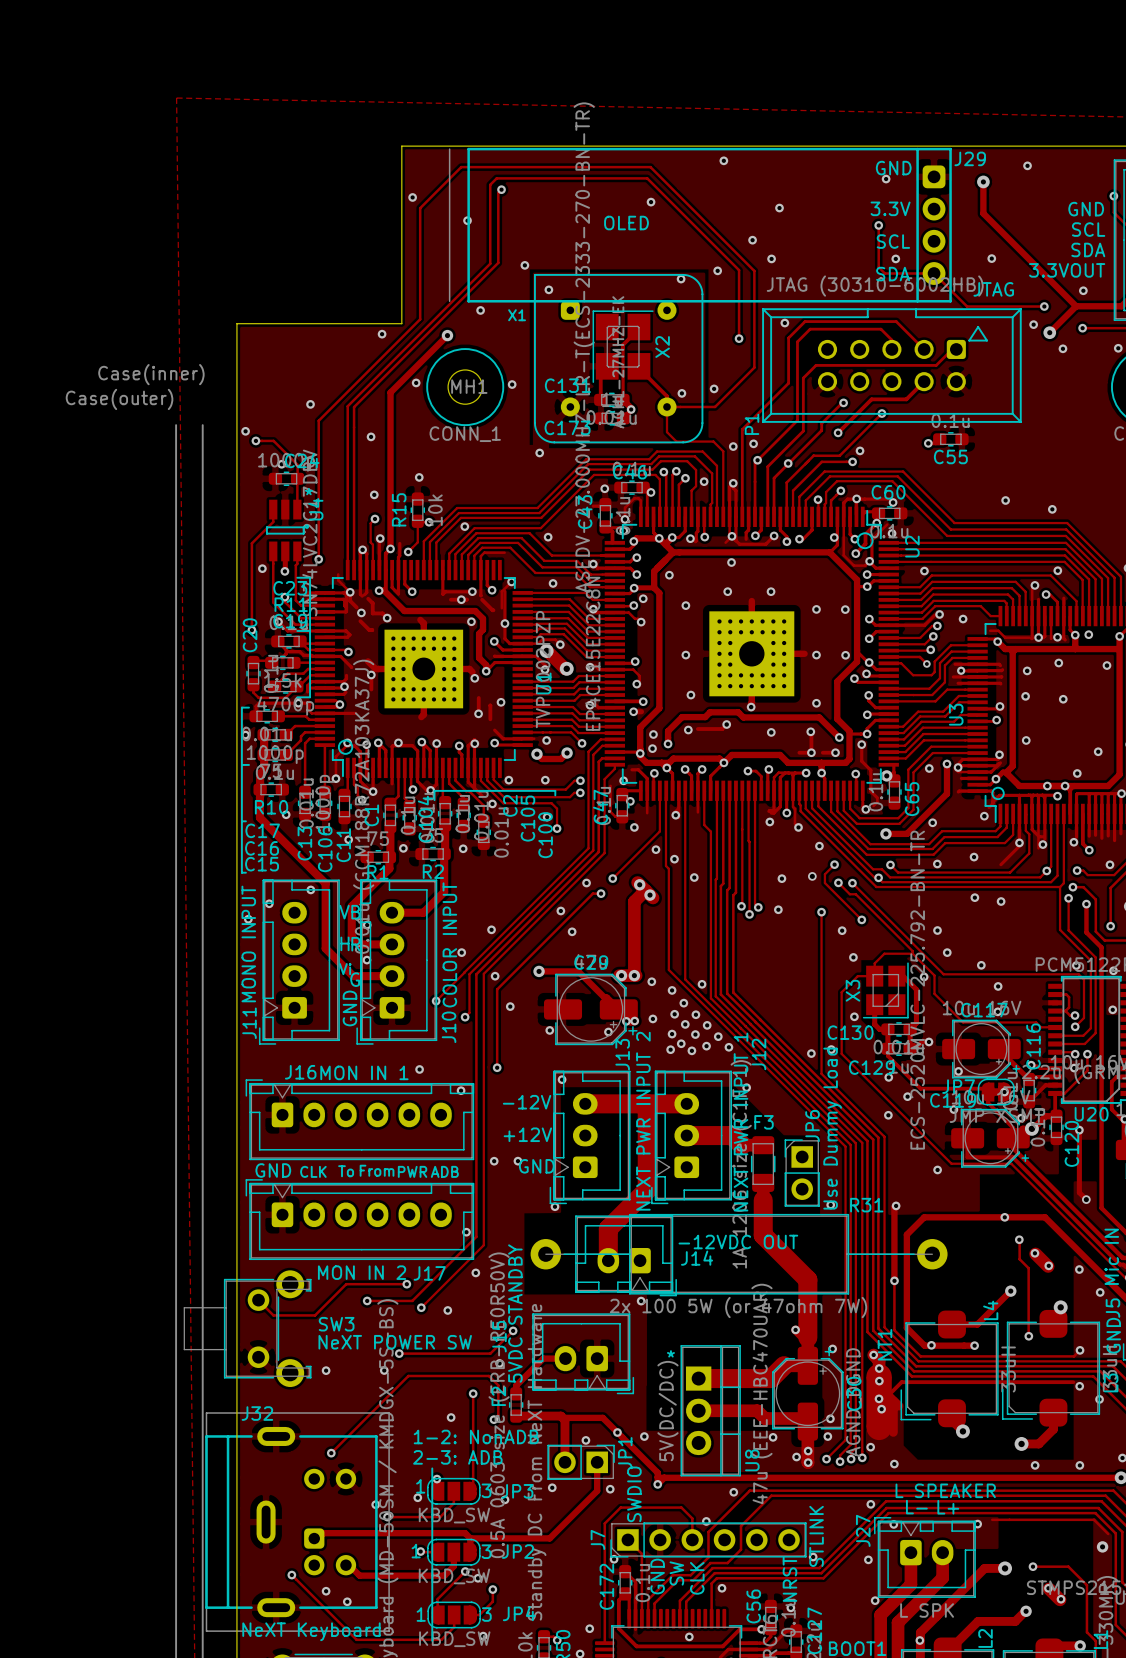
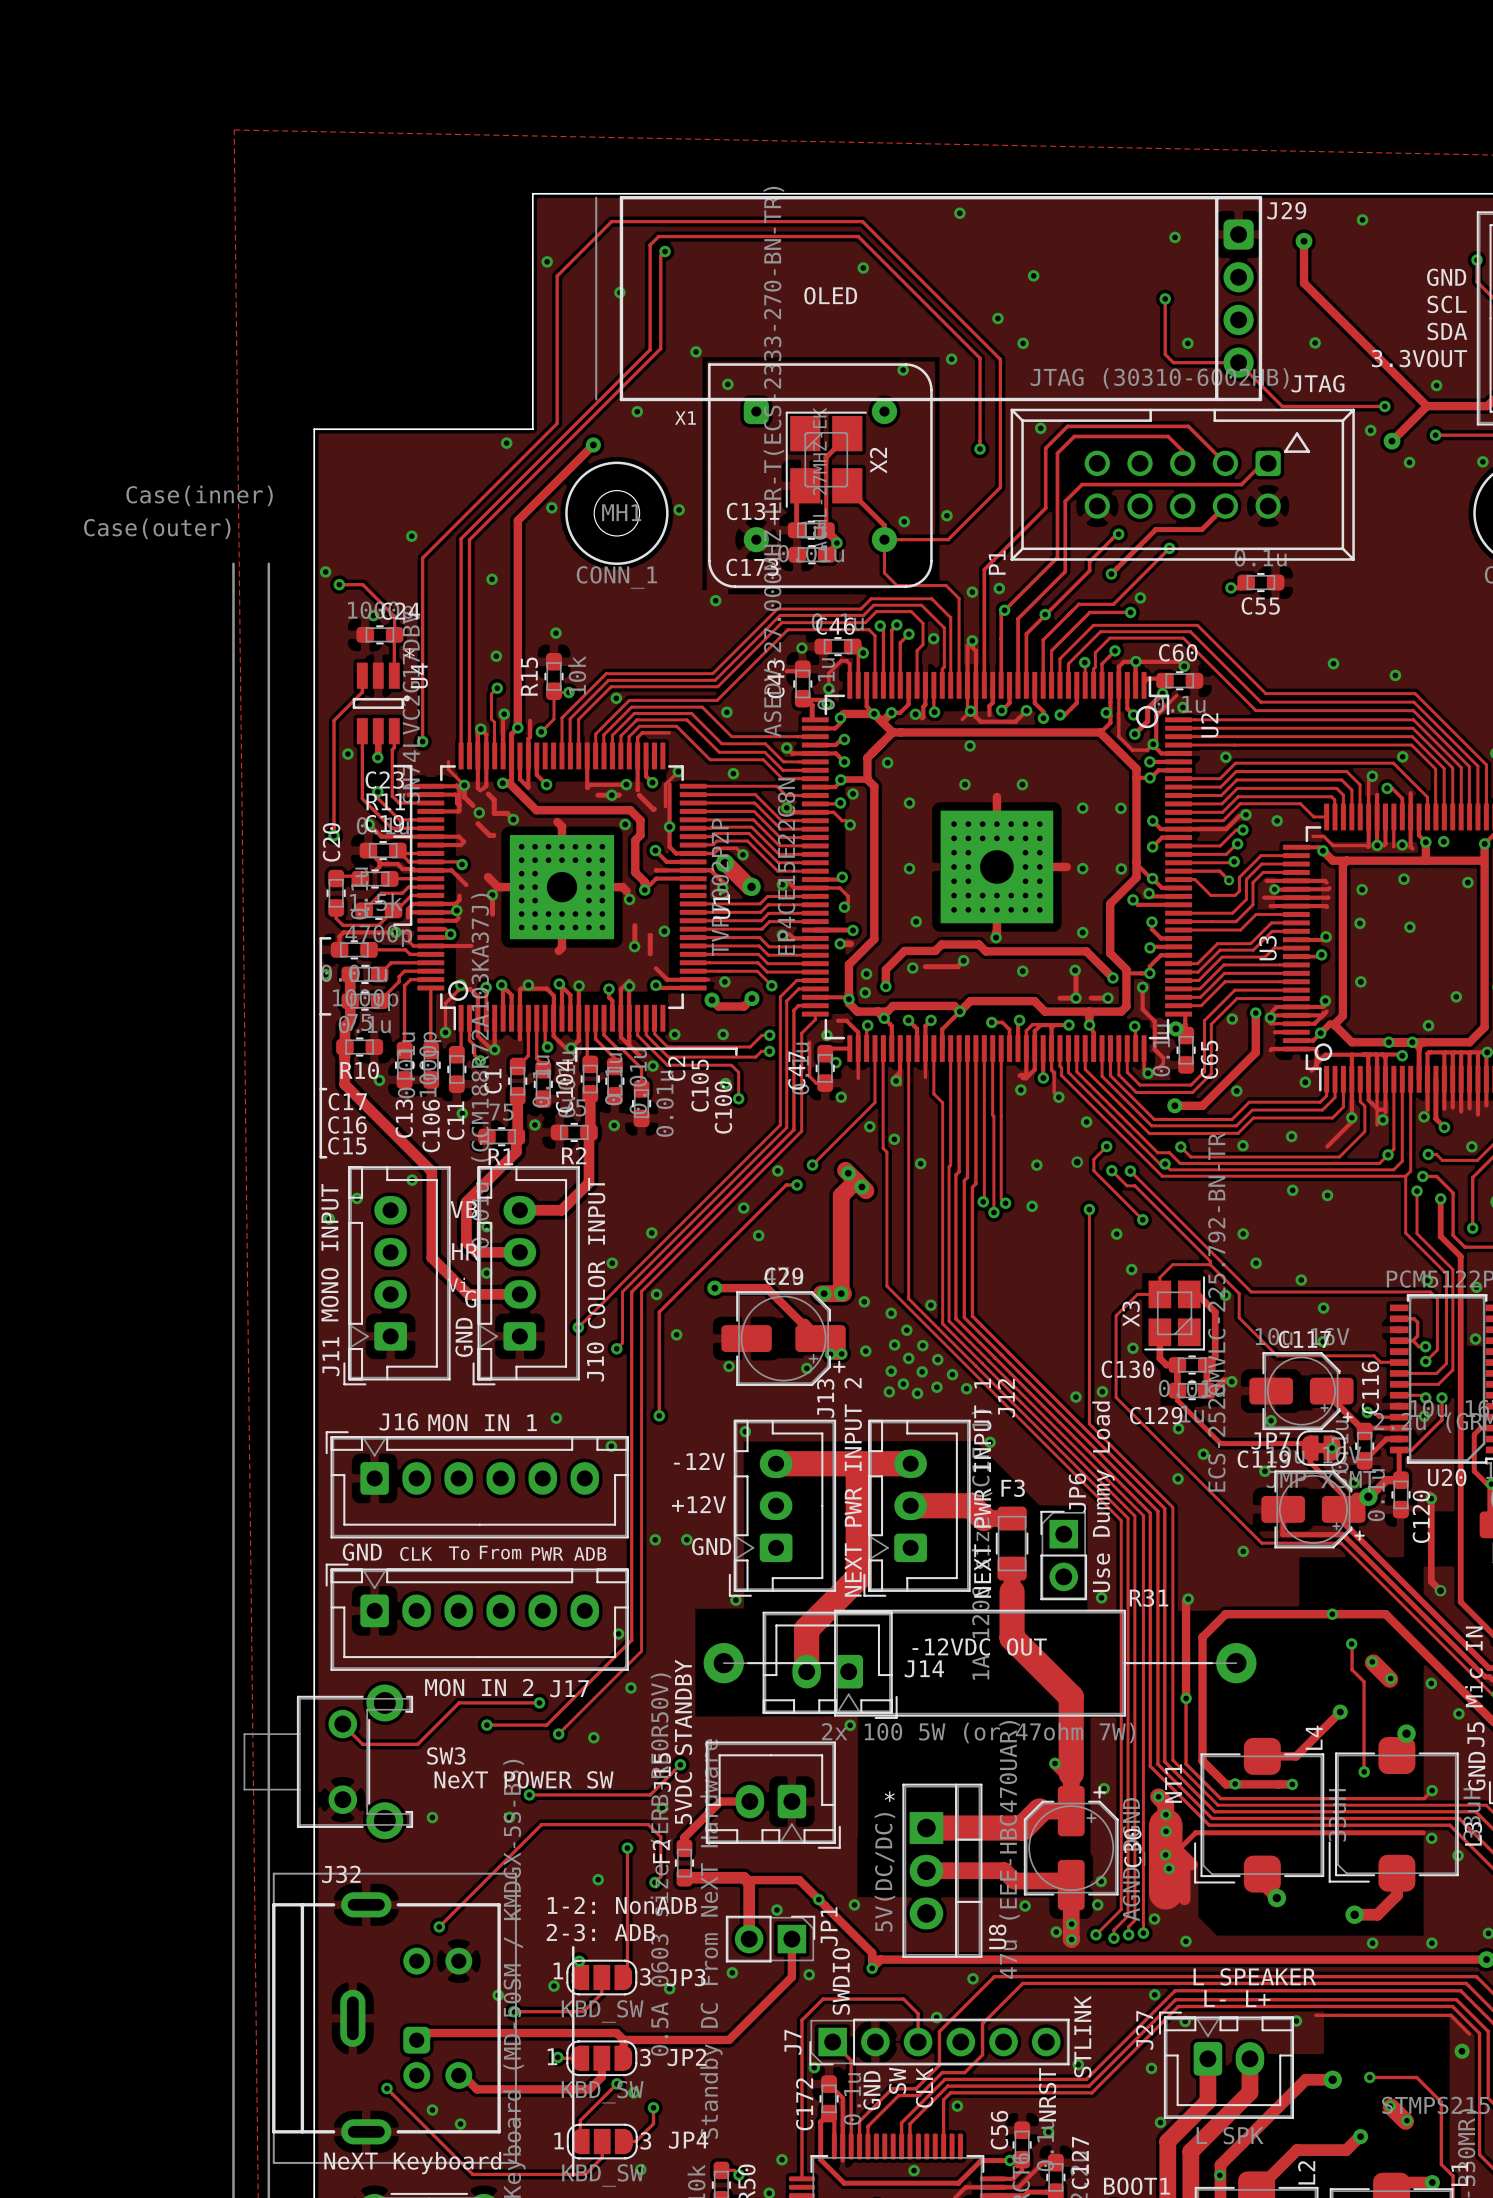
text: GND (893, 168) -> none
text: 3.3V (890, 208) -> none
text: SCL (893, 241) -> none
text: SDA (893, 274) -> none

